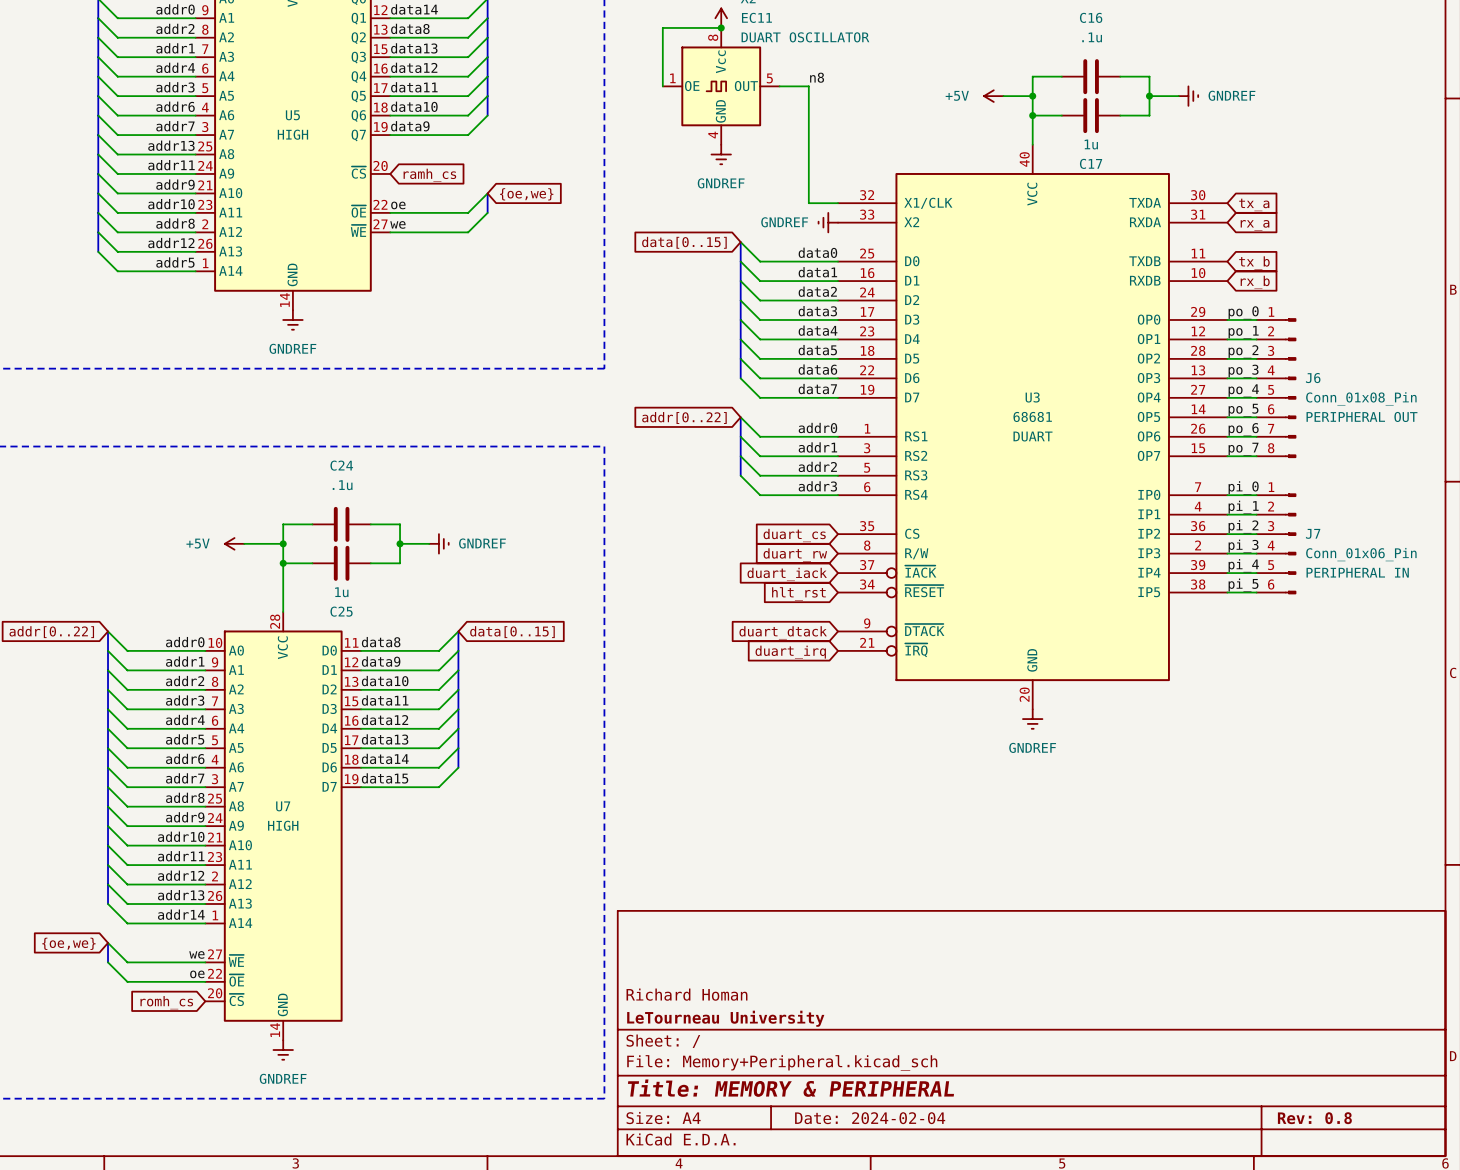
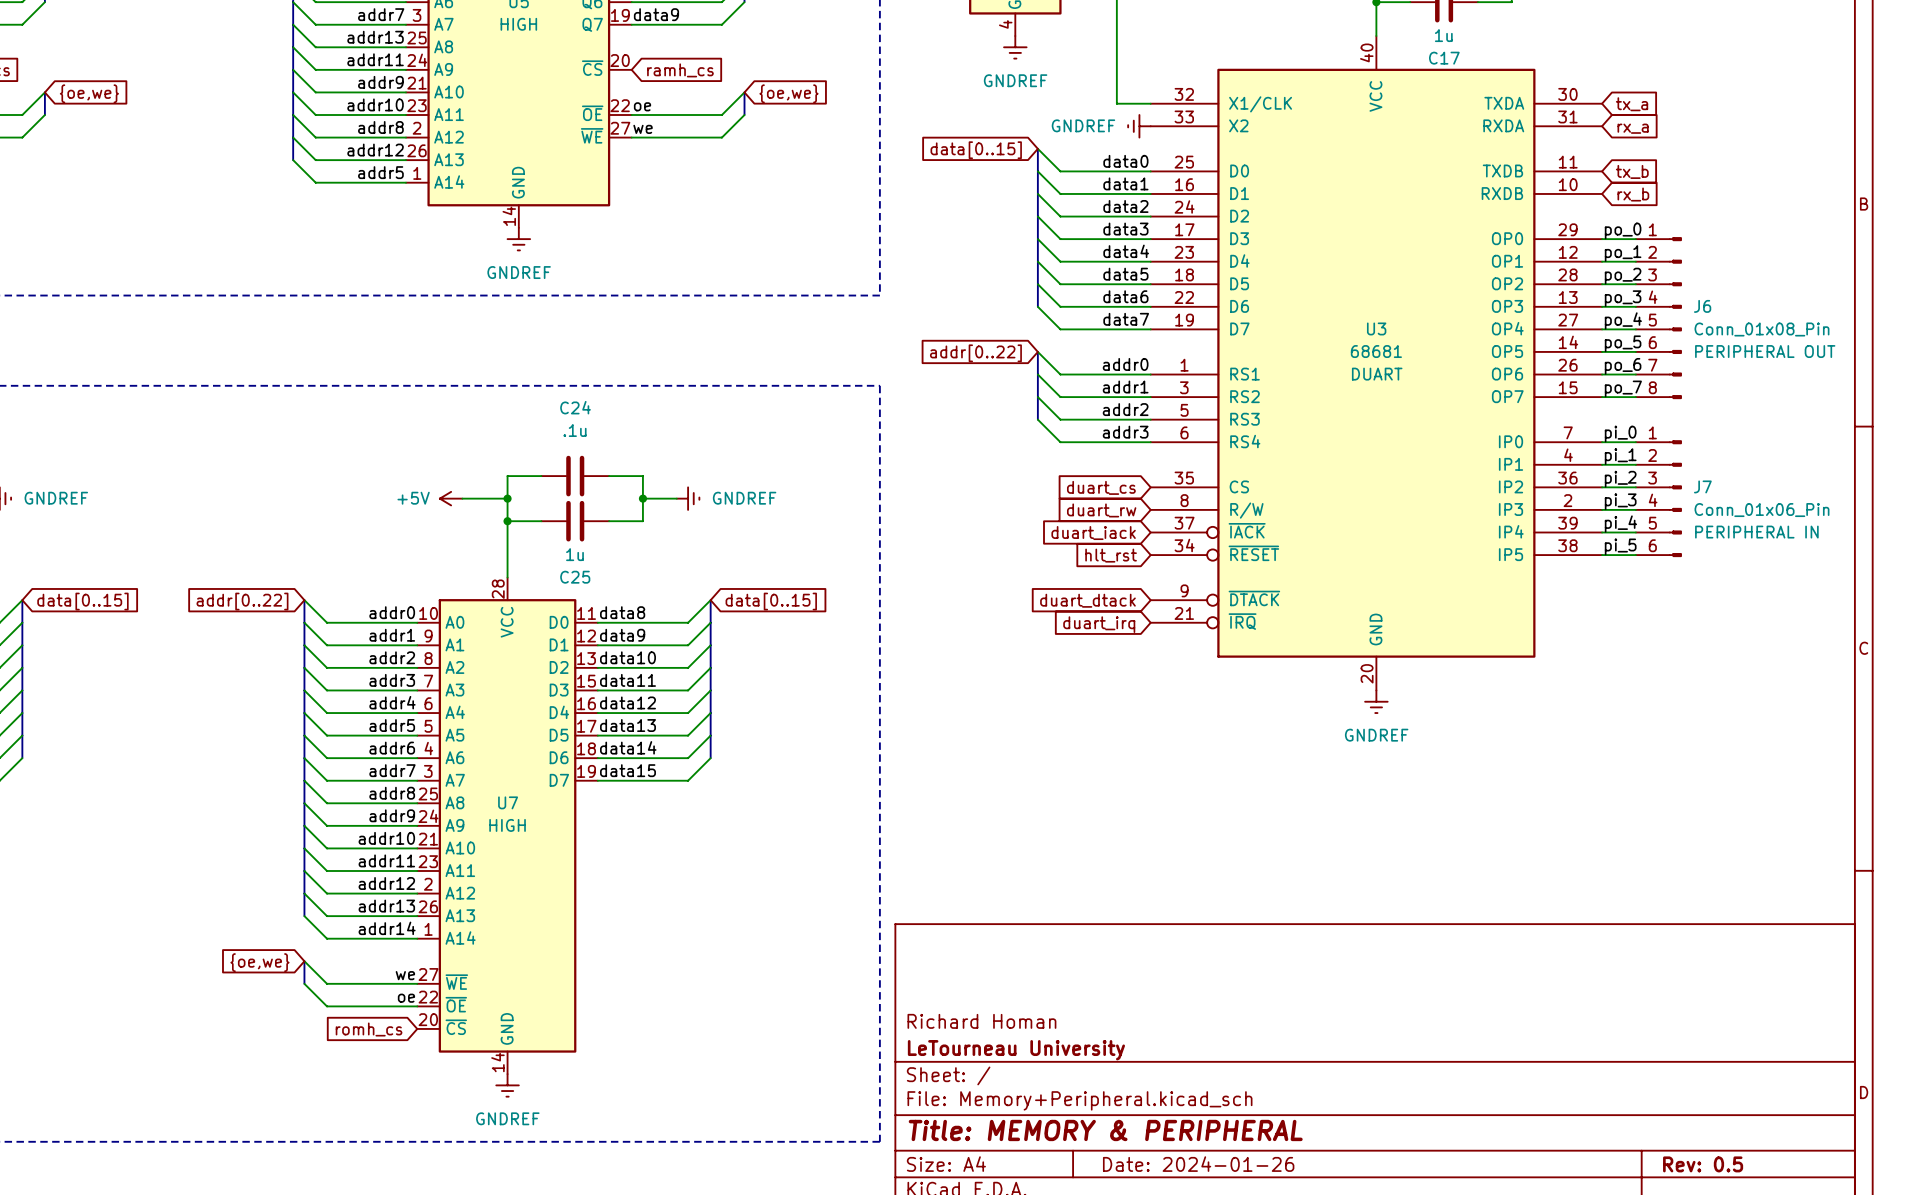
title block: Date: 2024-02-04 (870, 1118) -> Date: 2024-01-26 (1198, 1164)
title block: Rev: 0.8 (1314, 1118) -> Rev: 0.5 (1703, 1164)

